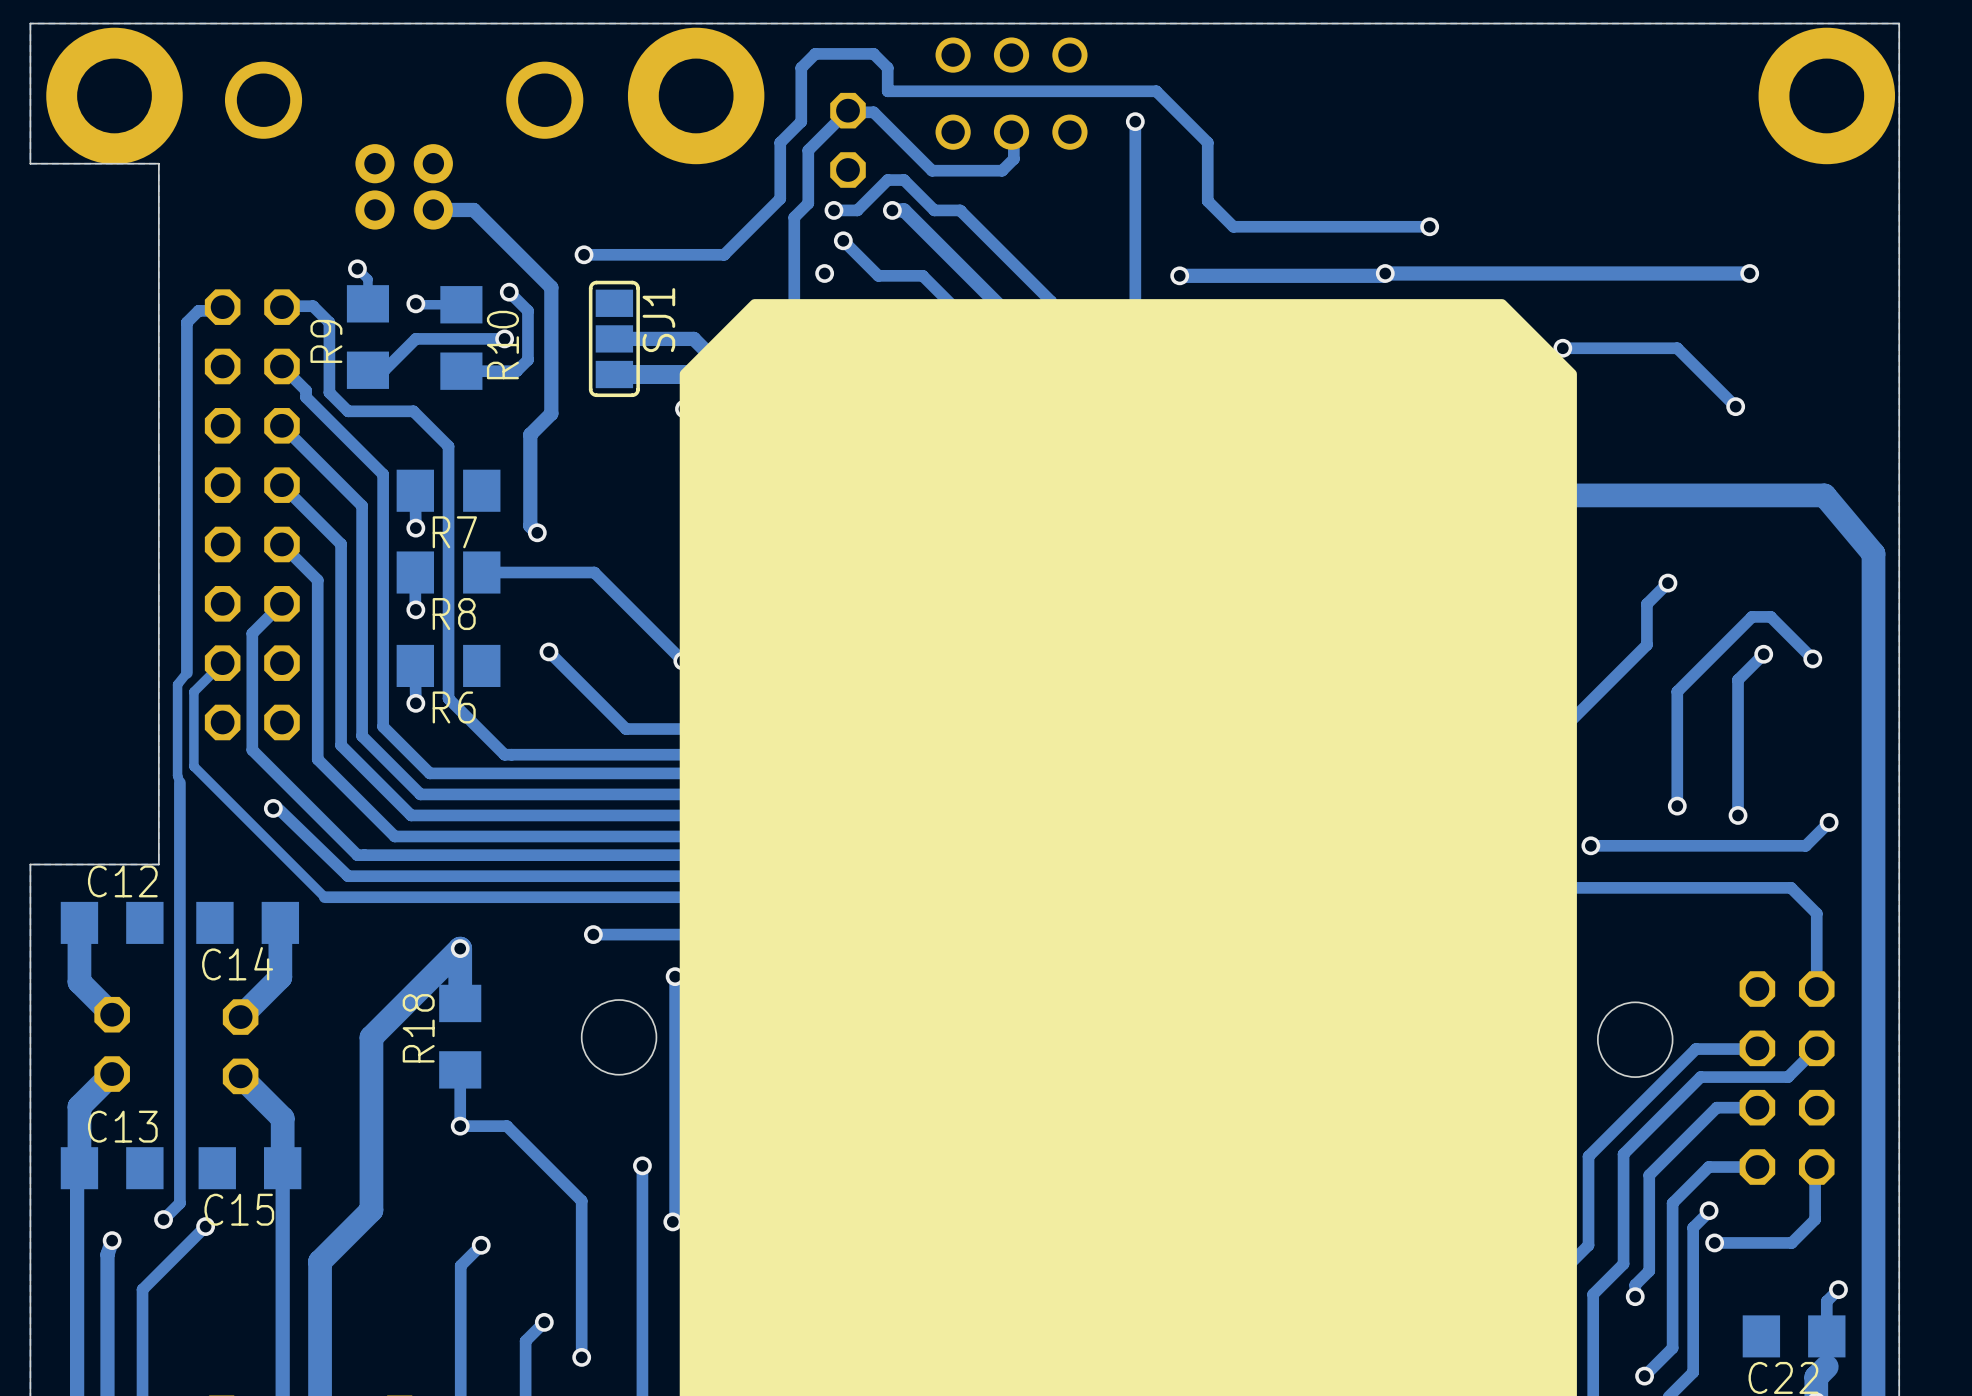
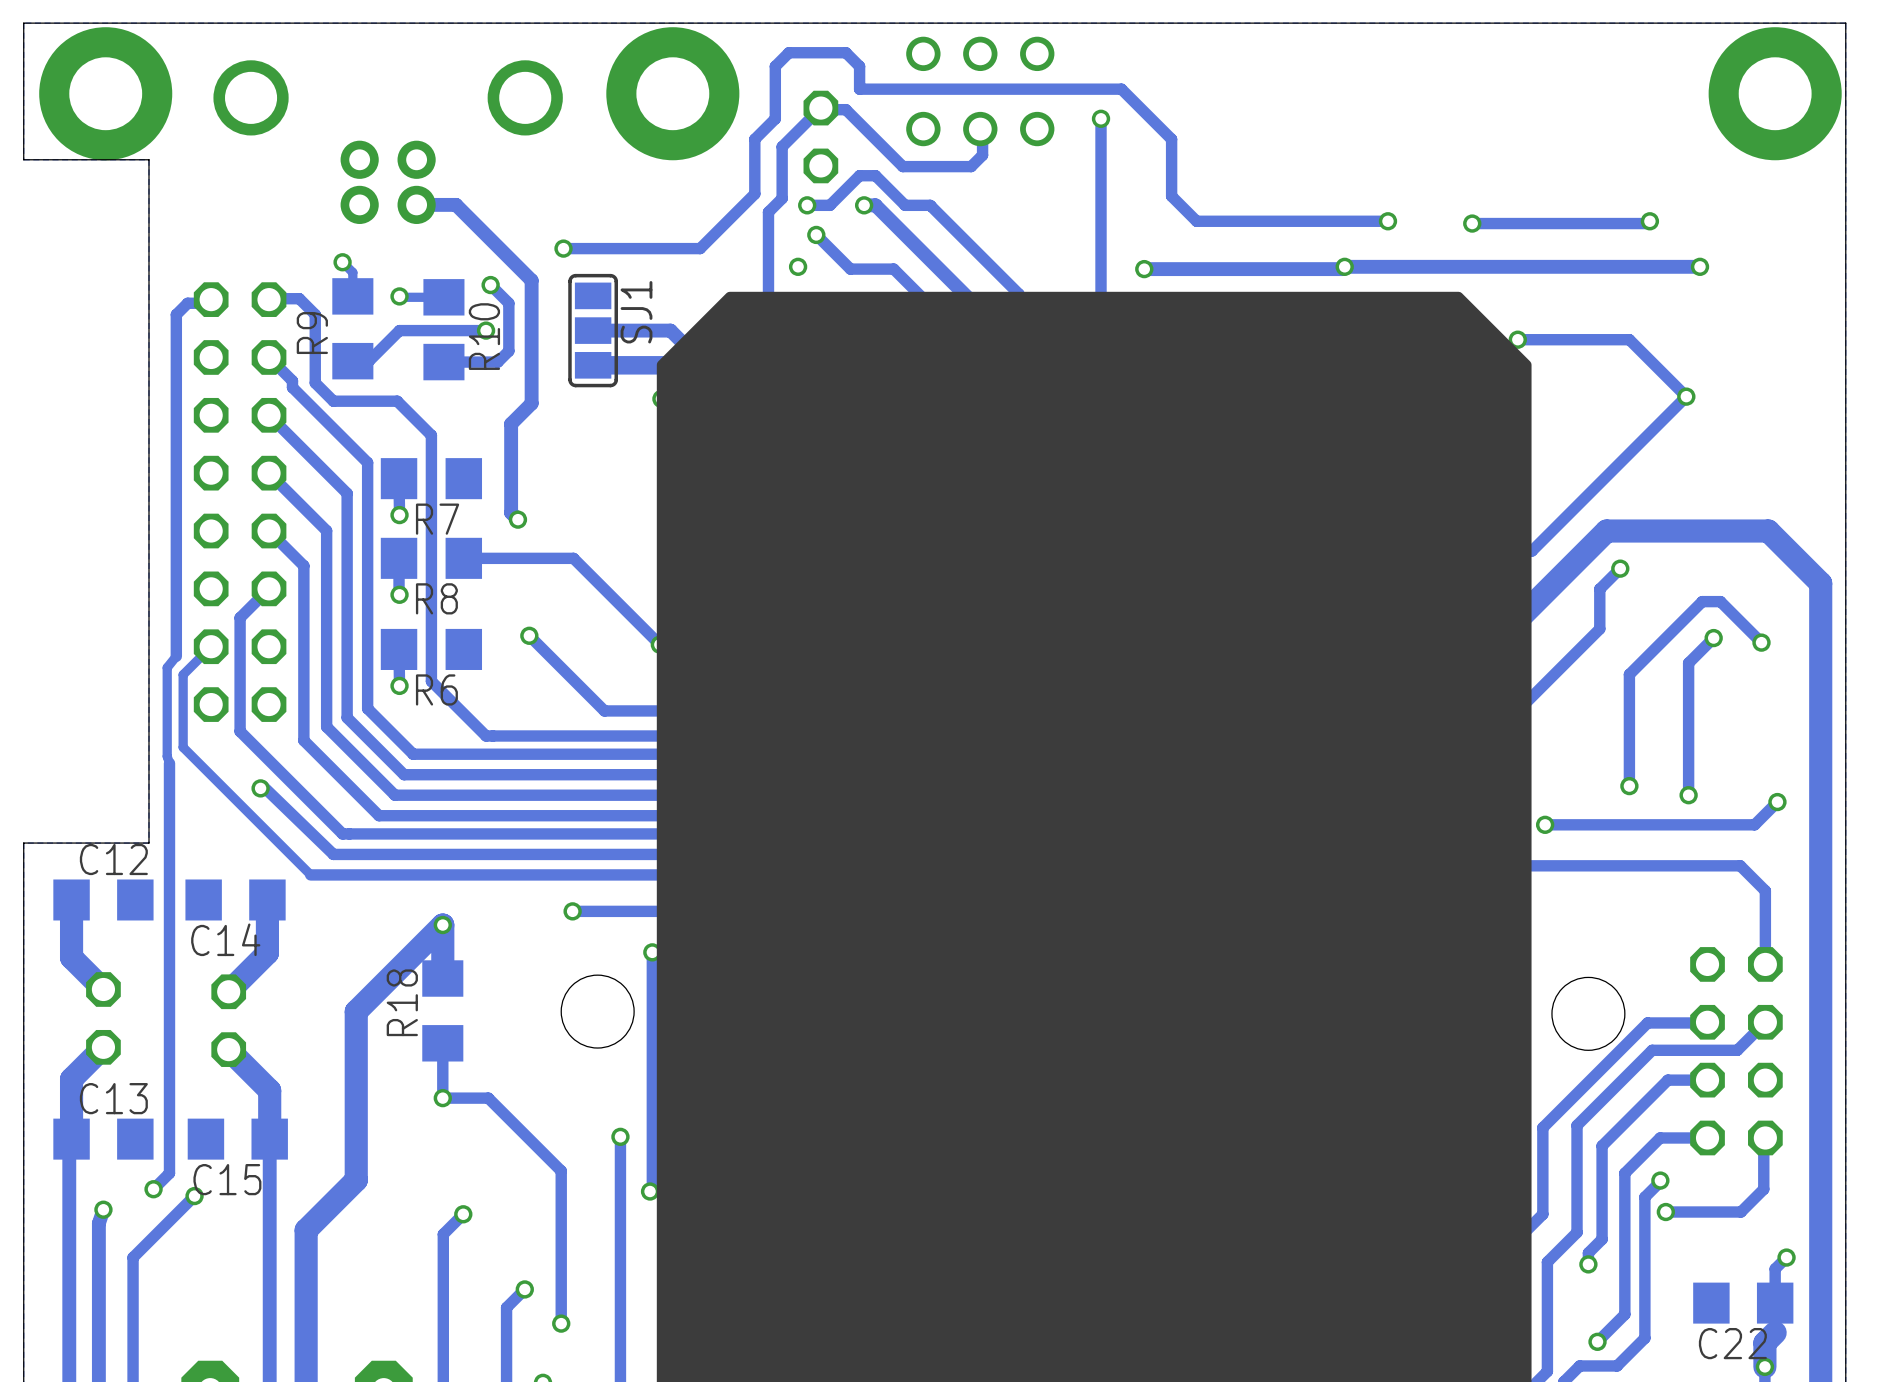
track: none -> (1649, 221) (1647, 223) (1472, 223)
via: none -> (1649, 221)
via: none -> (1472, 223)
track: none -> (1686, 396) (1531, 551) (1525, 551)
track: (1873, 598) (1873, 553) (1824, 495) (1401, 495) (1338, 558) (1338, 654) -> (1820, 583) (1768, 531) (1606, 531) (1499, 638) (1299, 638)

